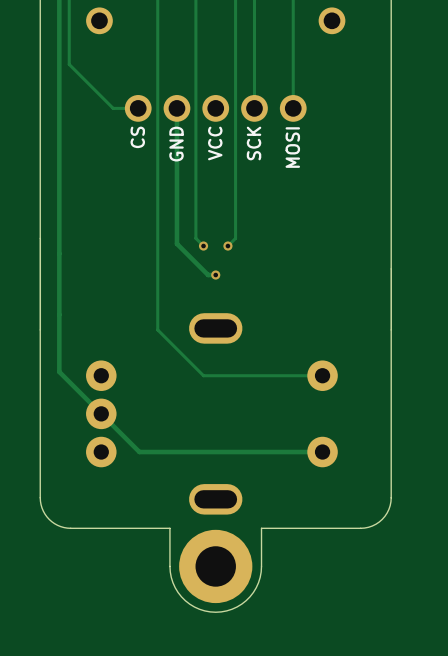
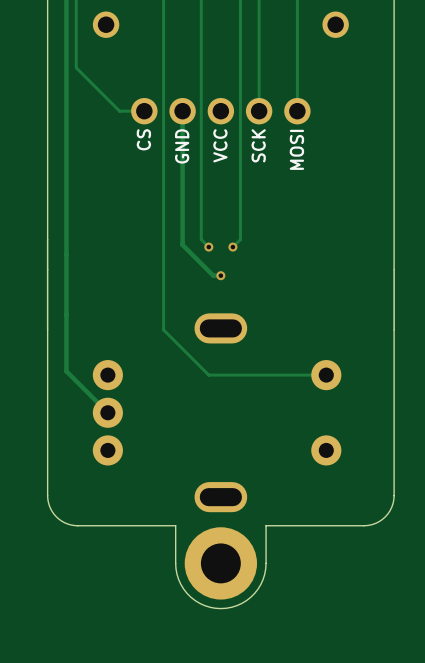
track: (101, 413) (139, 452) (322, 452) -> none

